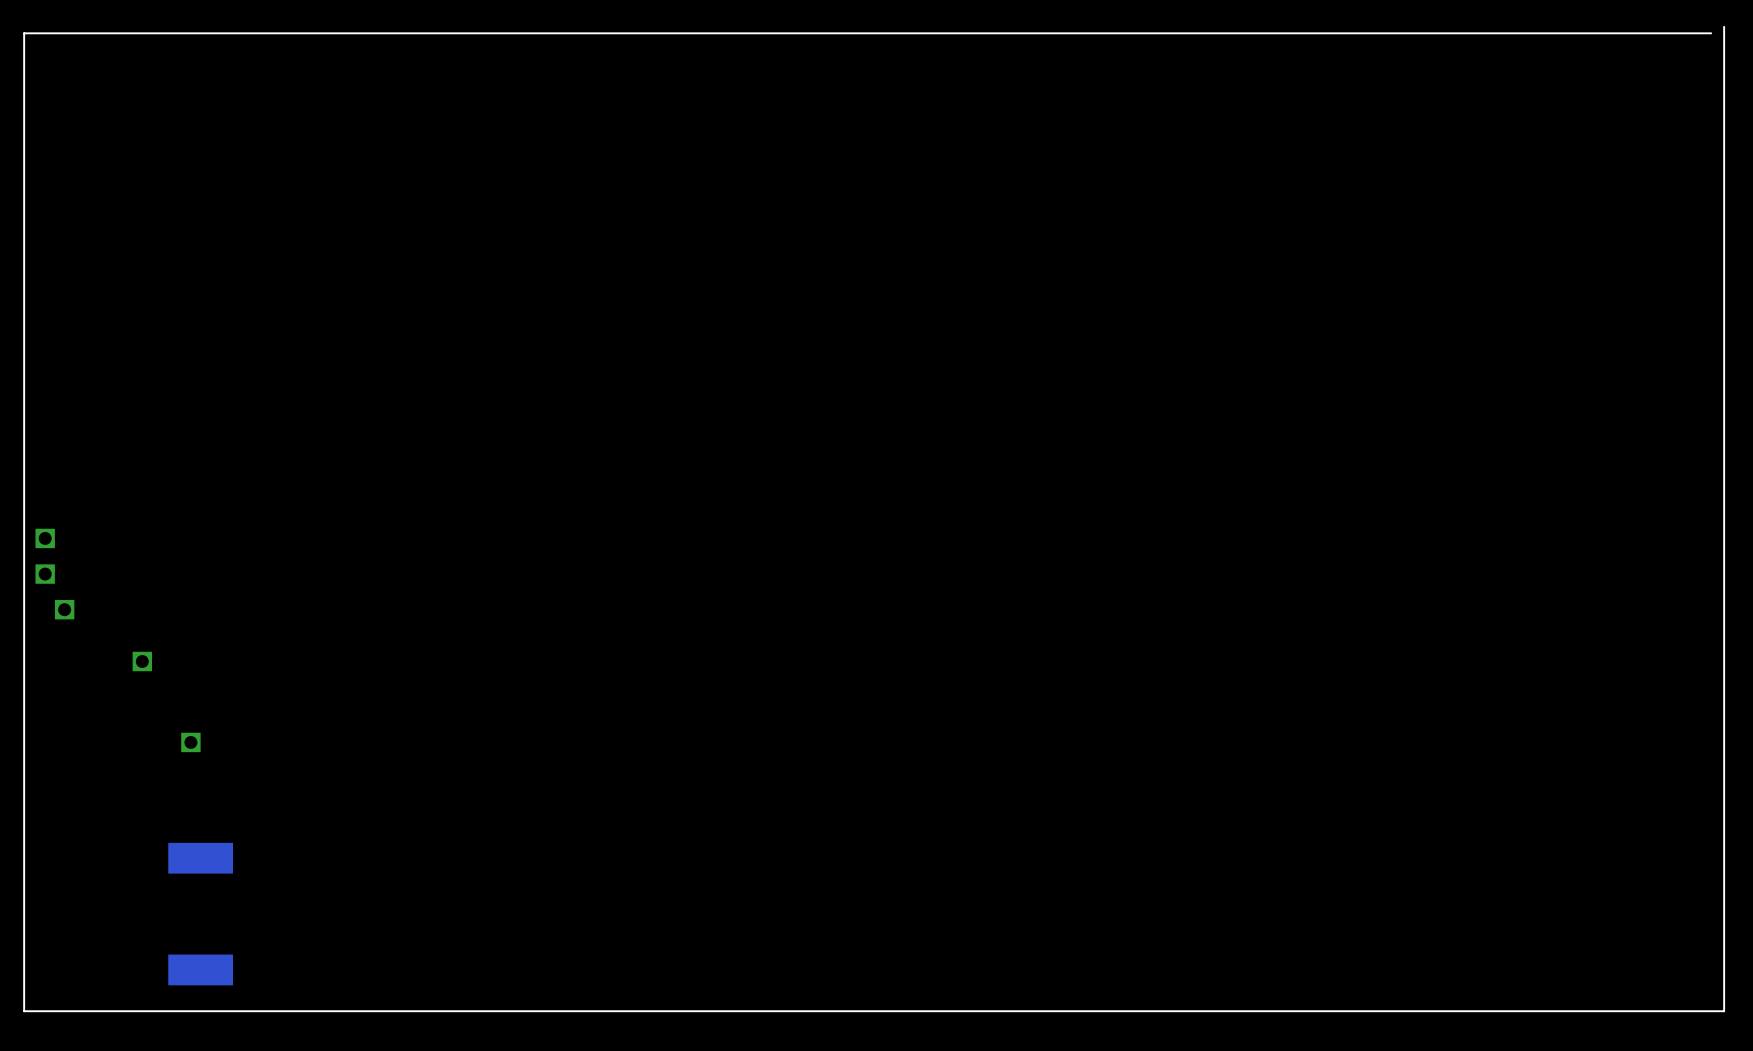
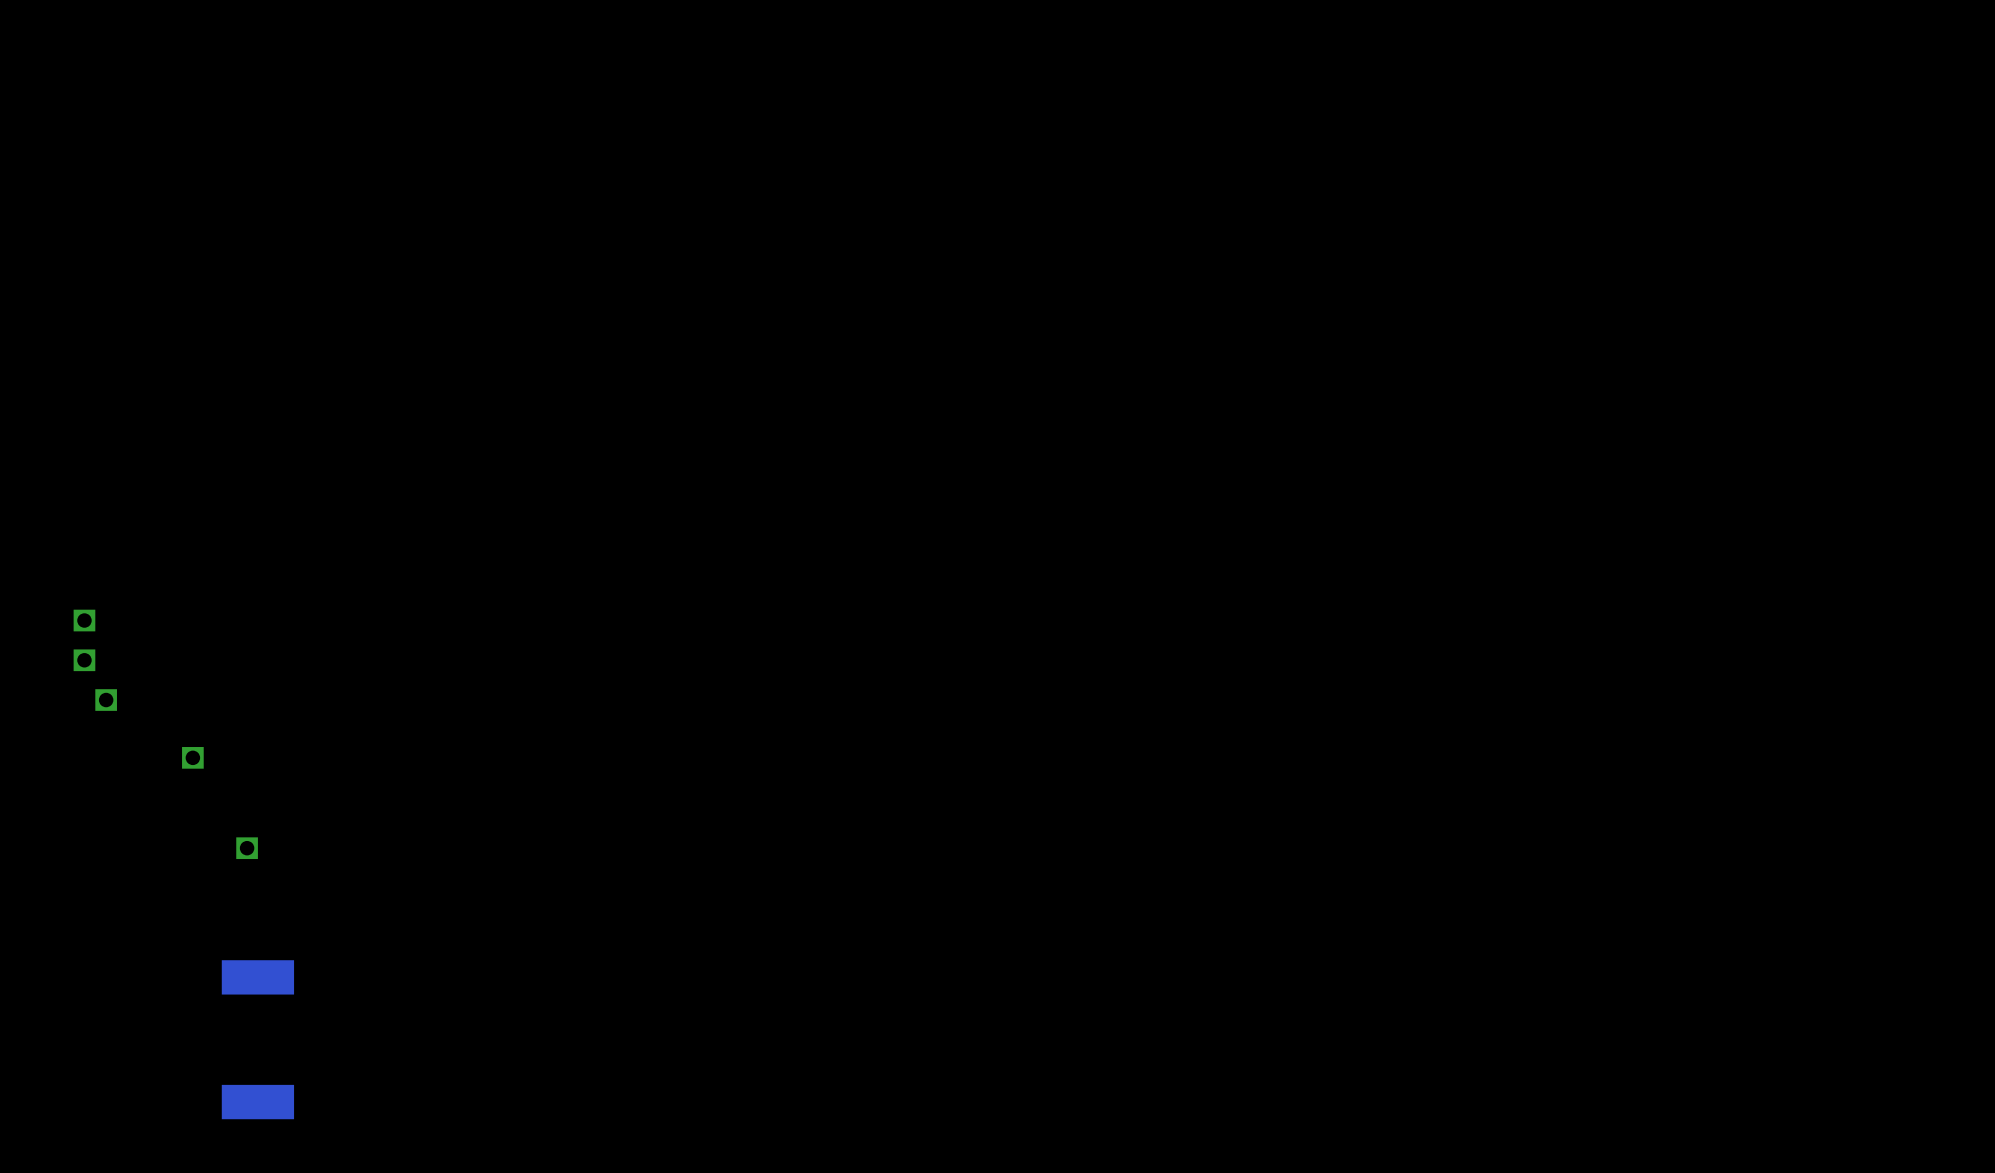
board edge: (1724, 26) (1724, 1011) (24, 1011) (24, 33) (1711, 33) -> none

